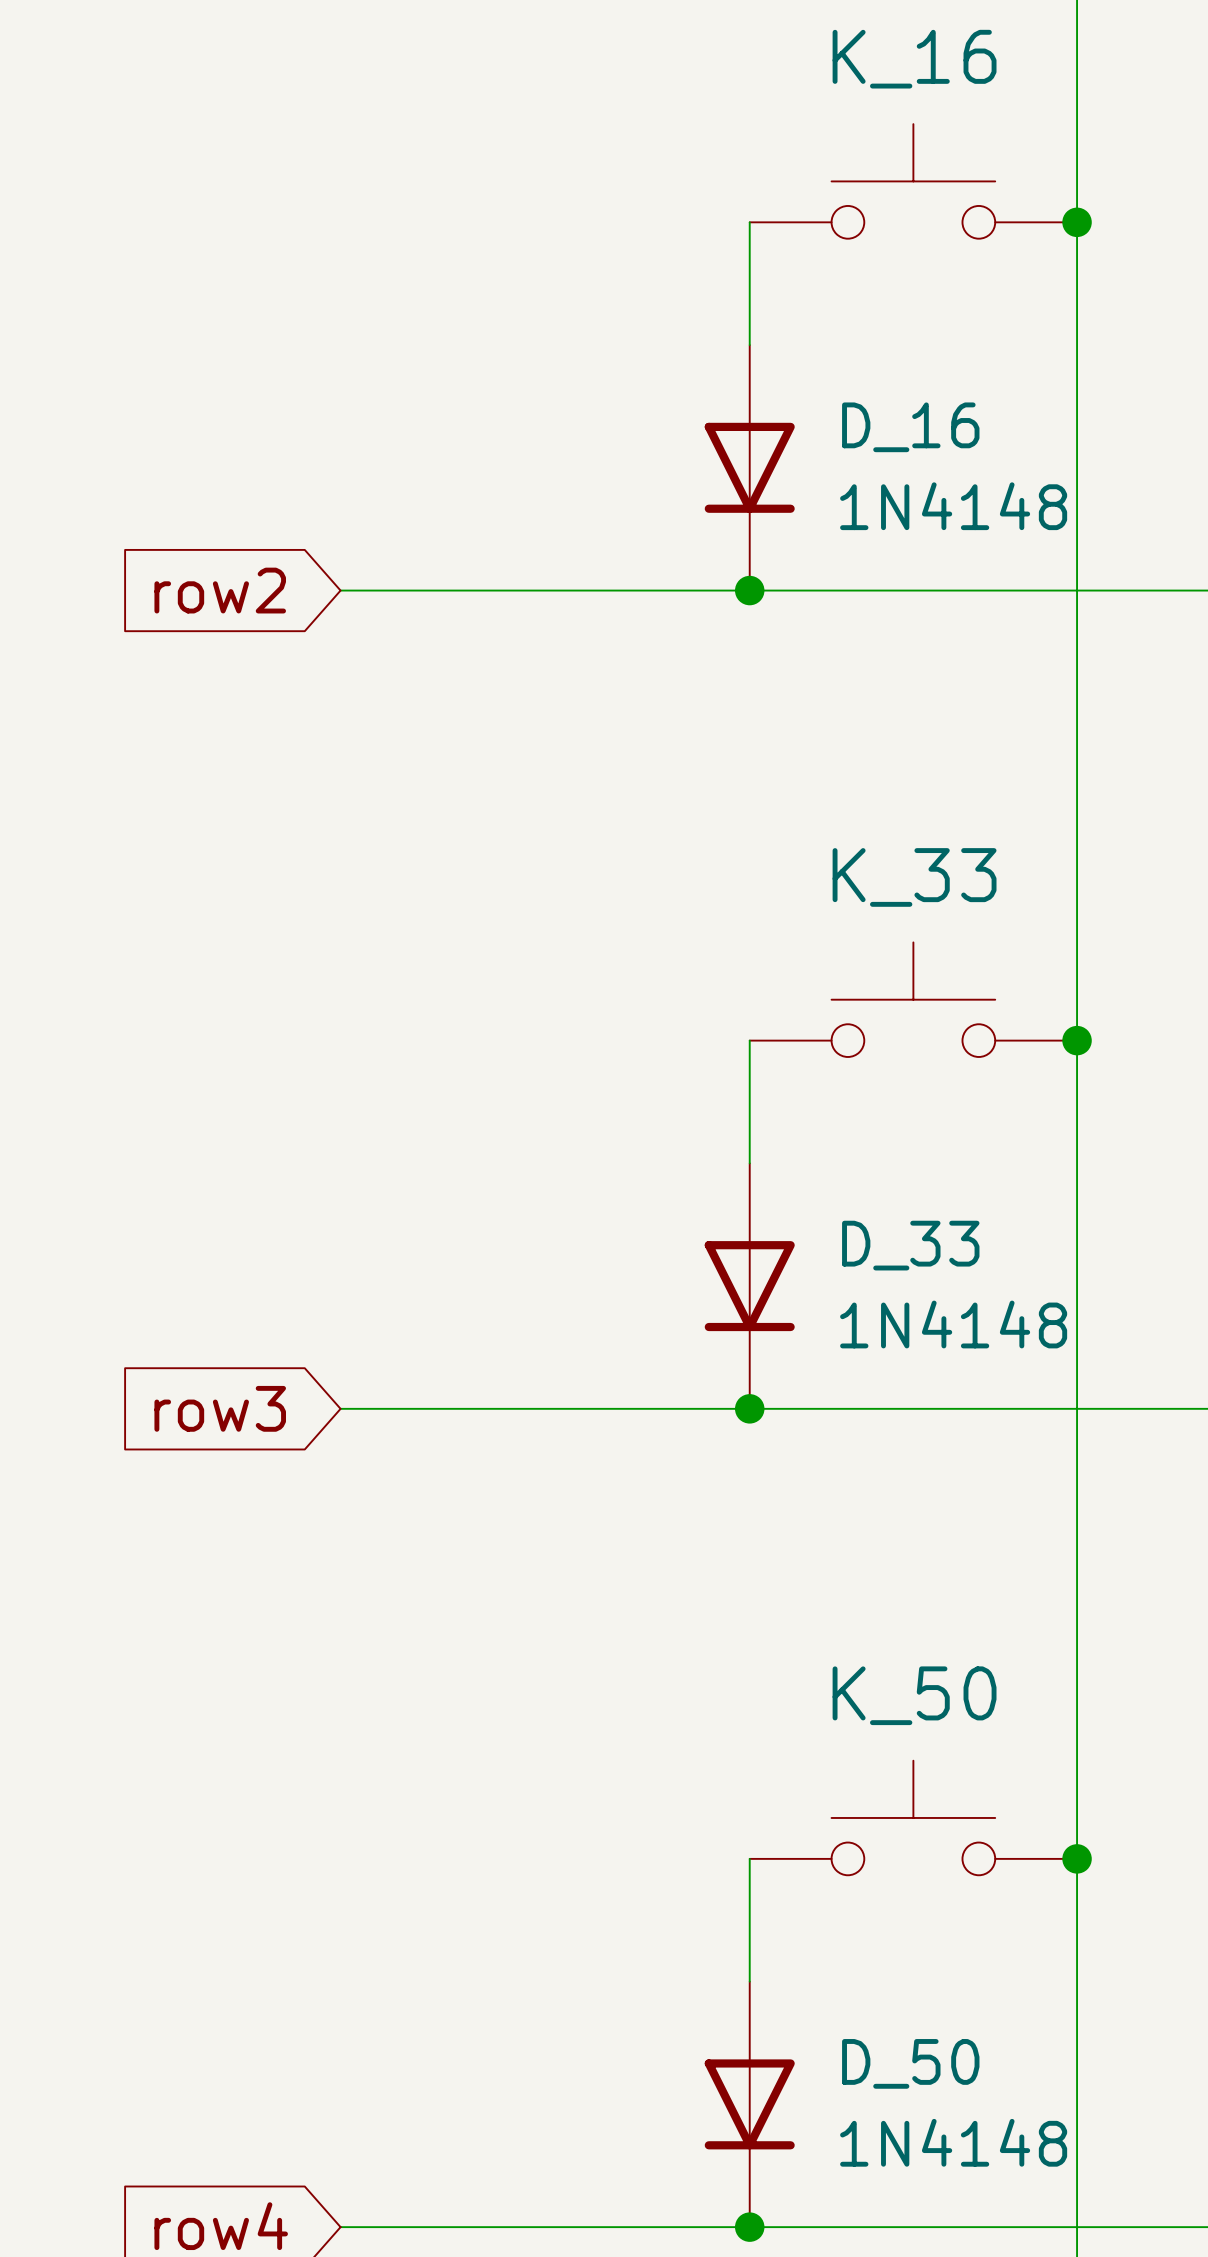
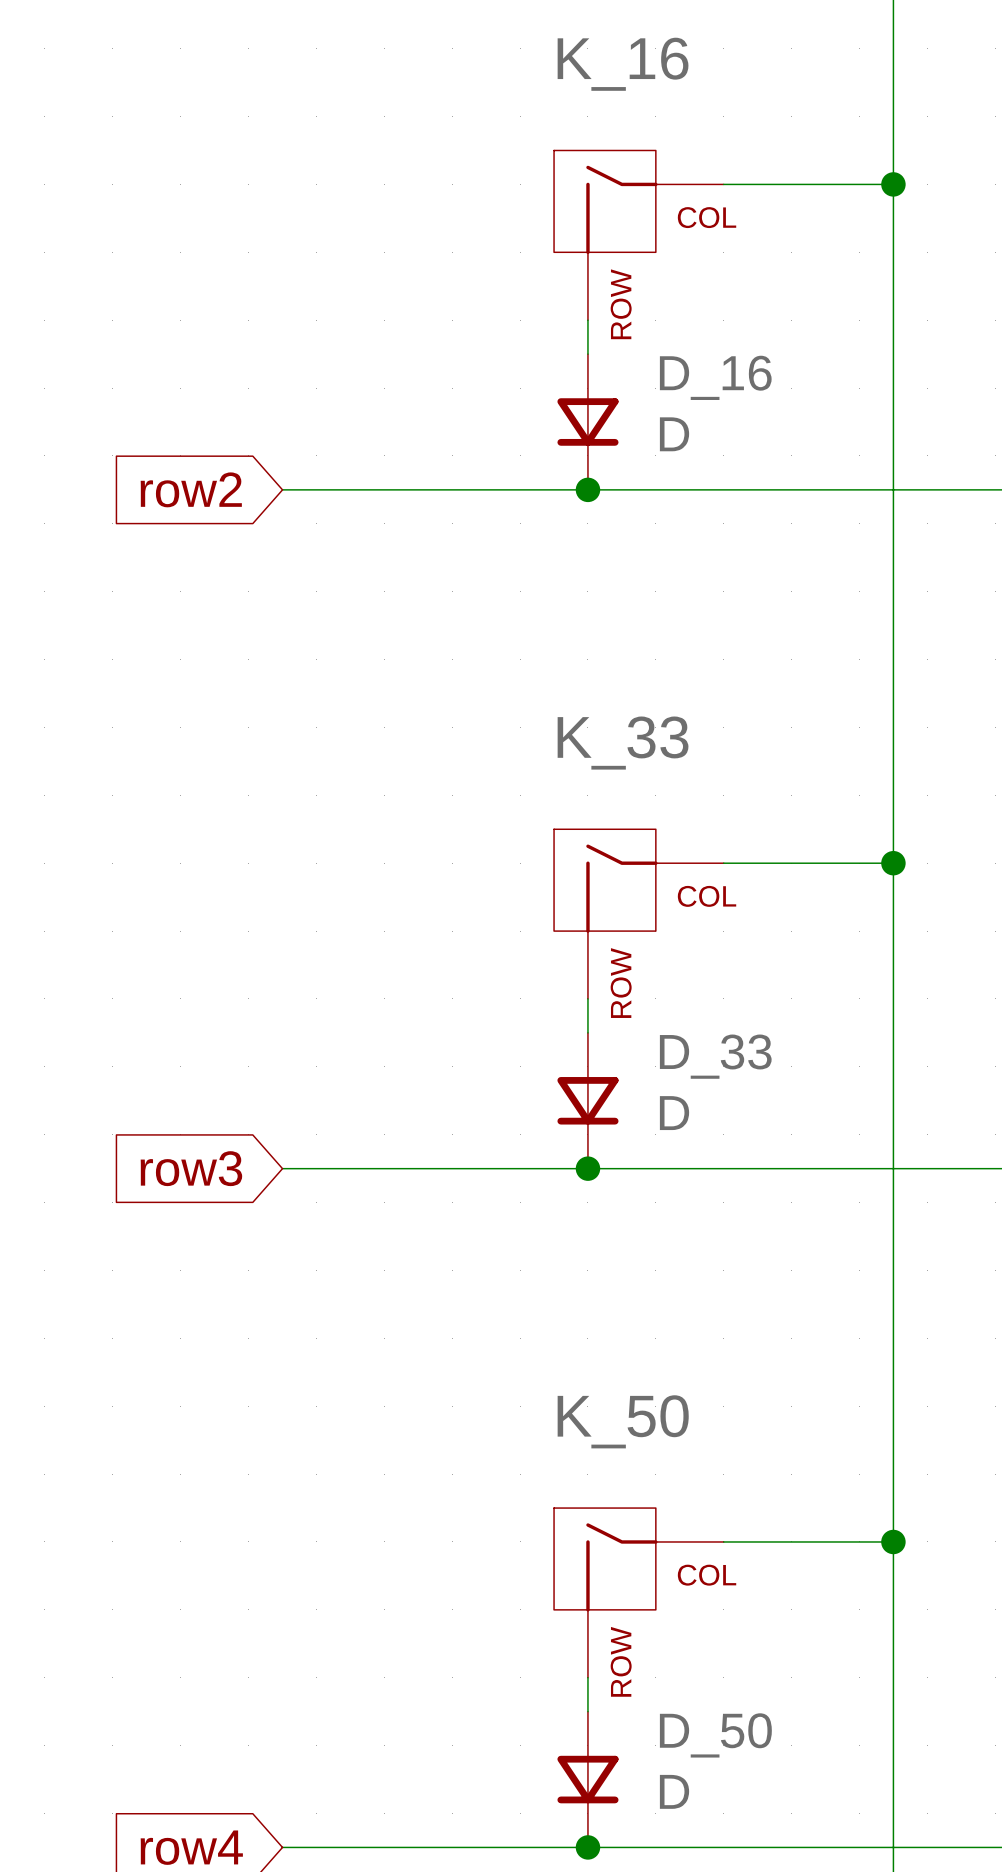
K_16 name position: K_16 (914, 59) -> K_16 (623, 64)
K_16 symbol: [749, 124, 1078, 239] -> [554, 150, 724, 321]
wire: (749, 222) (749, 345) -> none
wire: none -> (723, 184) (893, 184)
D_16 symbol: [704, 345, 795, 591] -> [557, 354, 619, 490]
wire: none -> (587, 320) (587, 354)
D_16 value: 1N4148 (953, 506) -> D (674, 434)
junction position: (749, 590) -> (587, 489)
K_33 name position: K_33 (914, 877) -> K_33 (623, 743)
K_33 symbol: [749, 942, 1078, 1057] -> [554, 829, 724, 999]
wire: (749, 1040) (749, 1163) -> none
wire: none -> (723, 863) (893, 863)
D_33 symbol: [704, 1163, 795, 1409] -> [557, 1032, 619, 1169]
wire: none -> (587, 998) (587, 1032)
D_33 value: 1N4148 (953, 1324) -> D (674, 1113)
junction position: (749, 1408) -> (587, 1168)
K_50 name position: K_50 (914, 1695) -> K_50 (623, 1421)
K_50 symbol: [749, 1760, 1078, 1876] -> [554, 1508, 724, 1678]
wire: (749, 1858) (749, 1981) -> none
wire: none -> (723, 1541) (893, 1541)
D_50 symbol: [704, 1981, 795, 2228] -> [557, 1711, 619, 1848]
wire: none -> (587, 1677) (587, 1711)
D_50 value: 1N4148 (953, 2142) -> D (674, 1791)
junction position: (749, 2227) -> (587, 1847)

